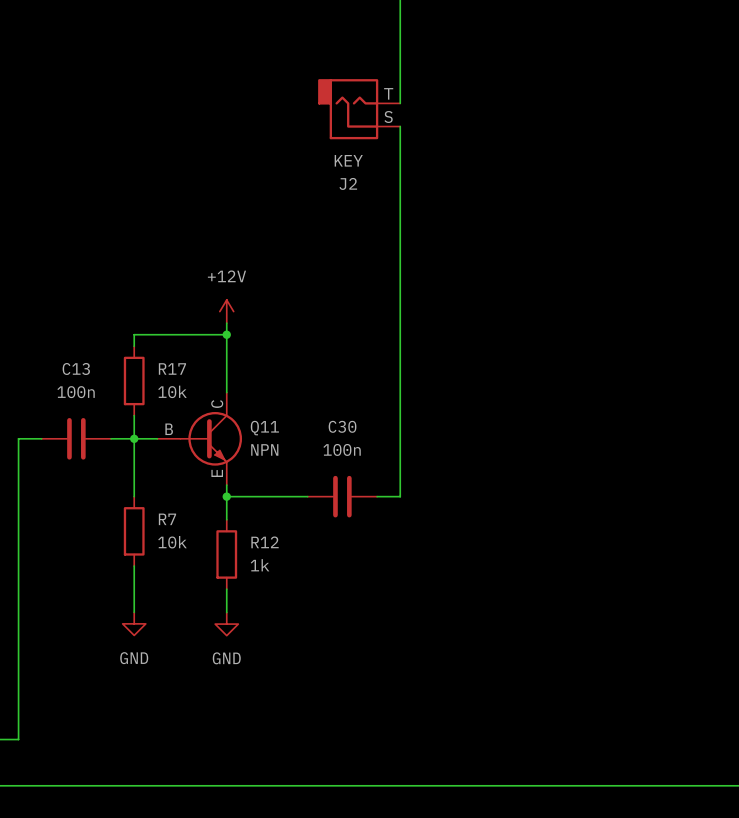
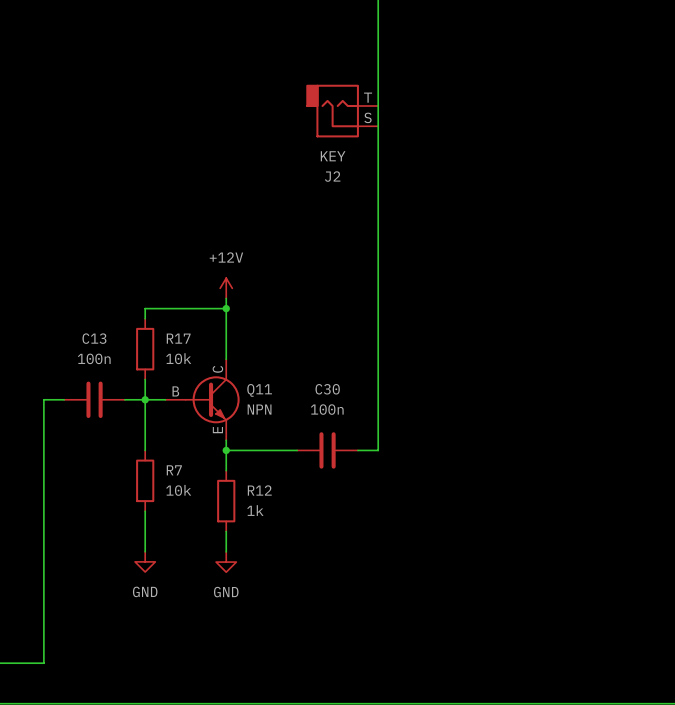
wire: none -> (378, 106) (378, 126)

